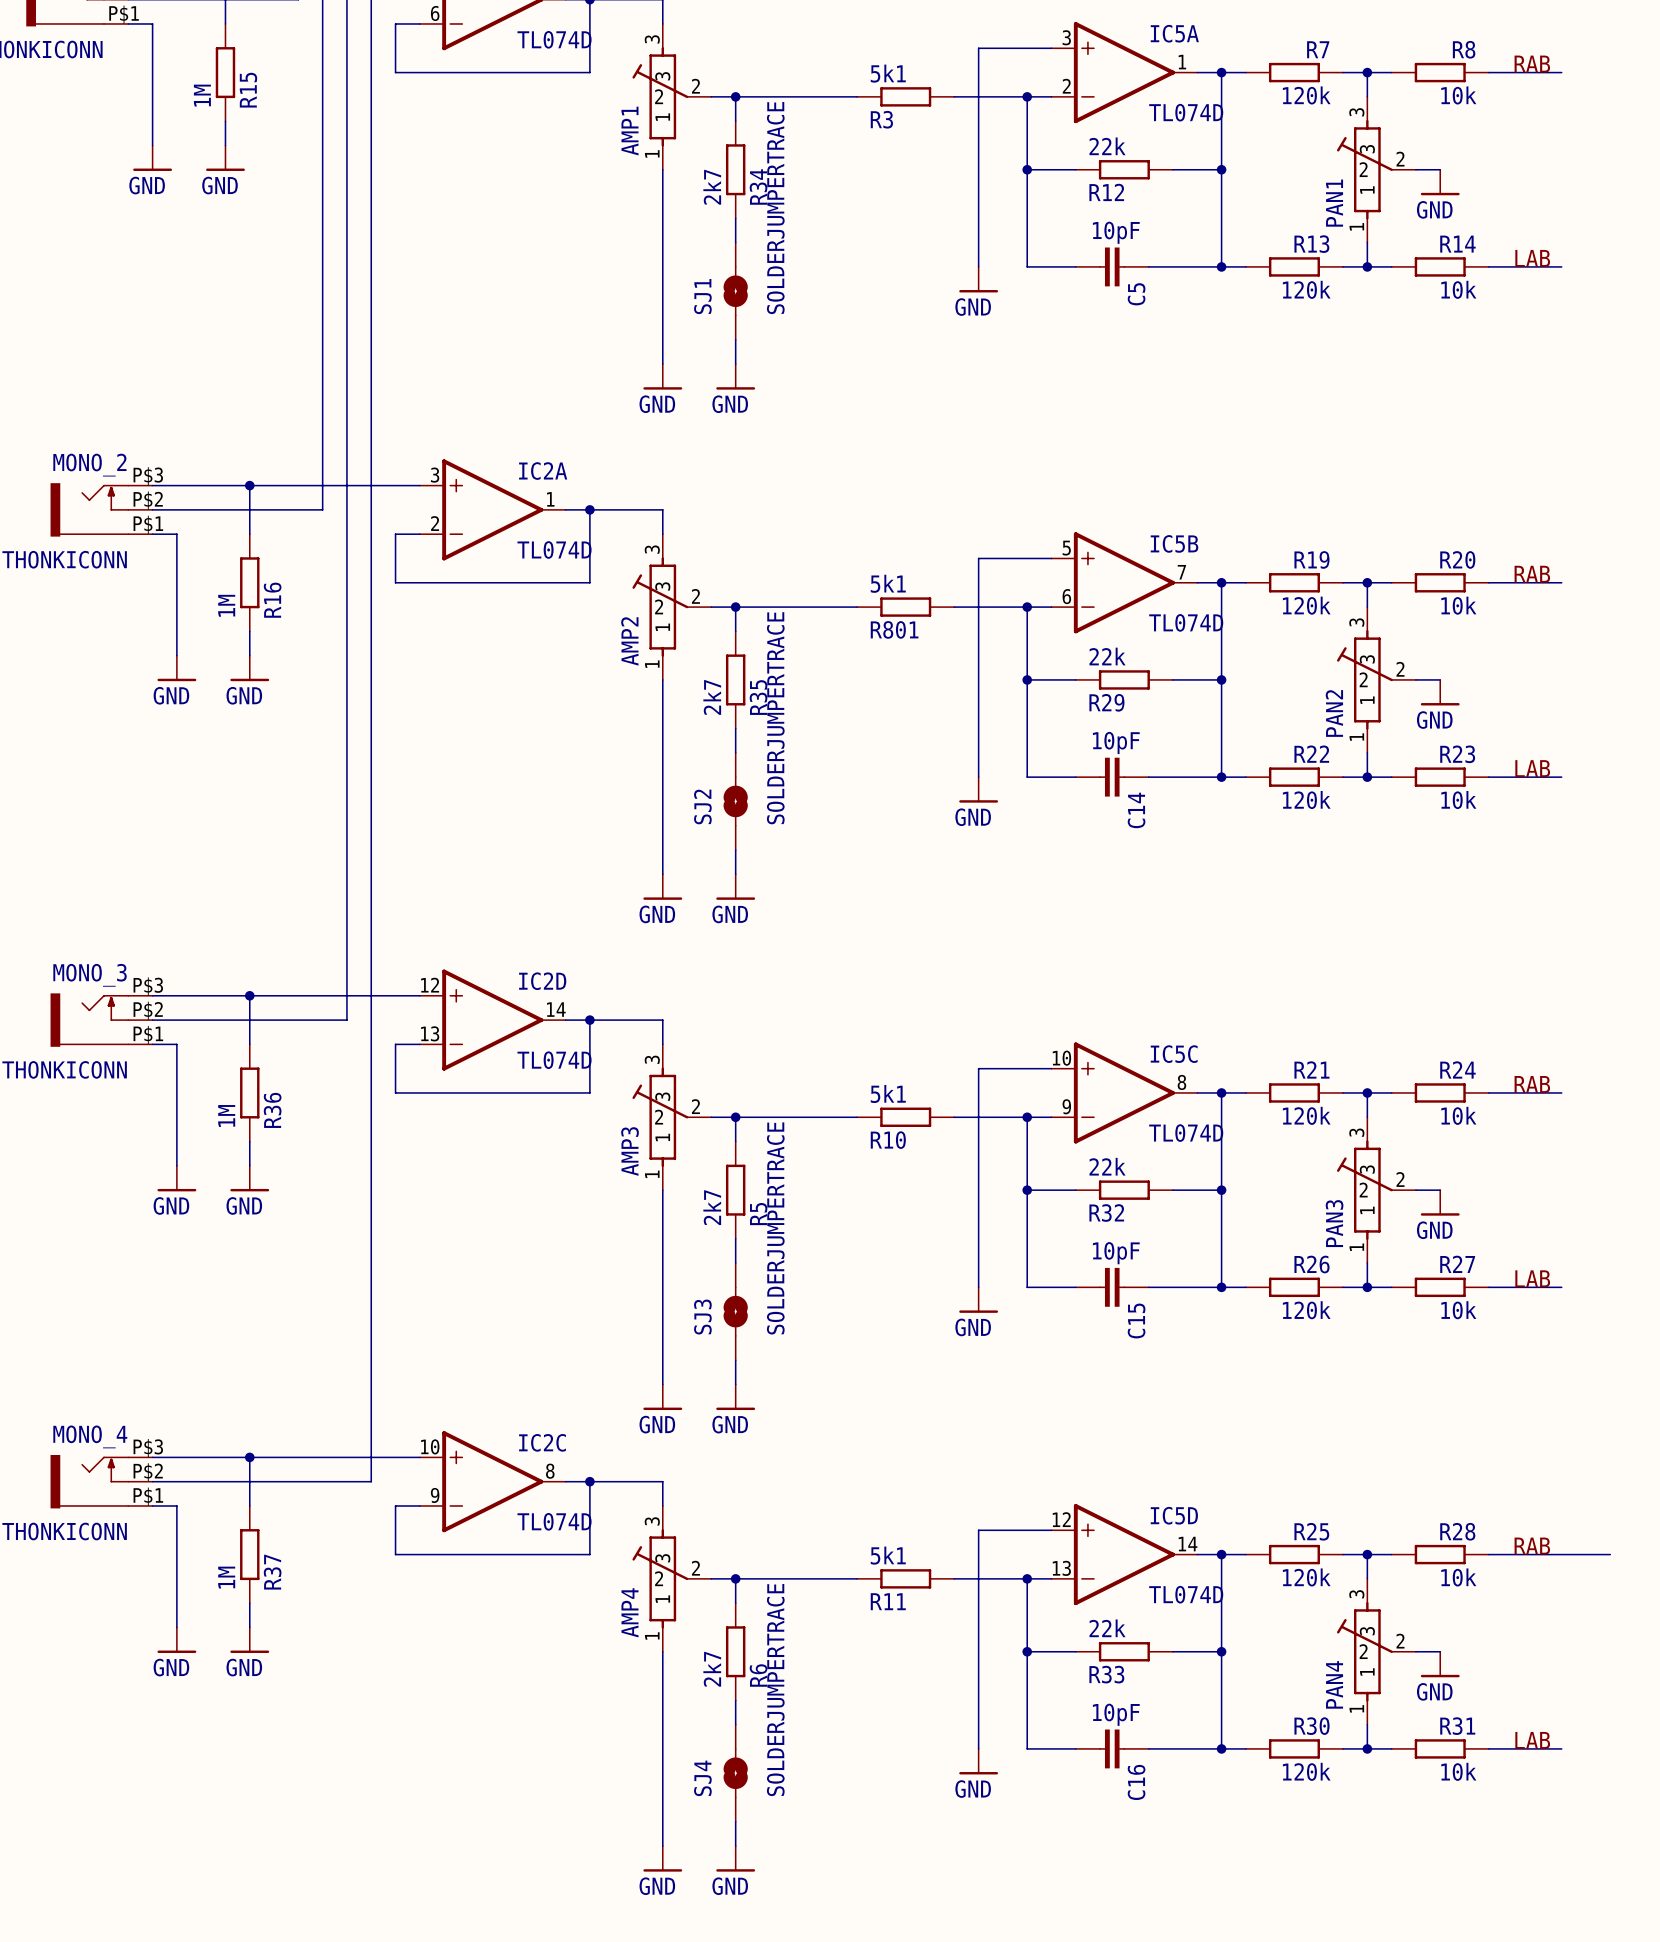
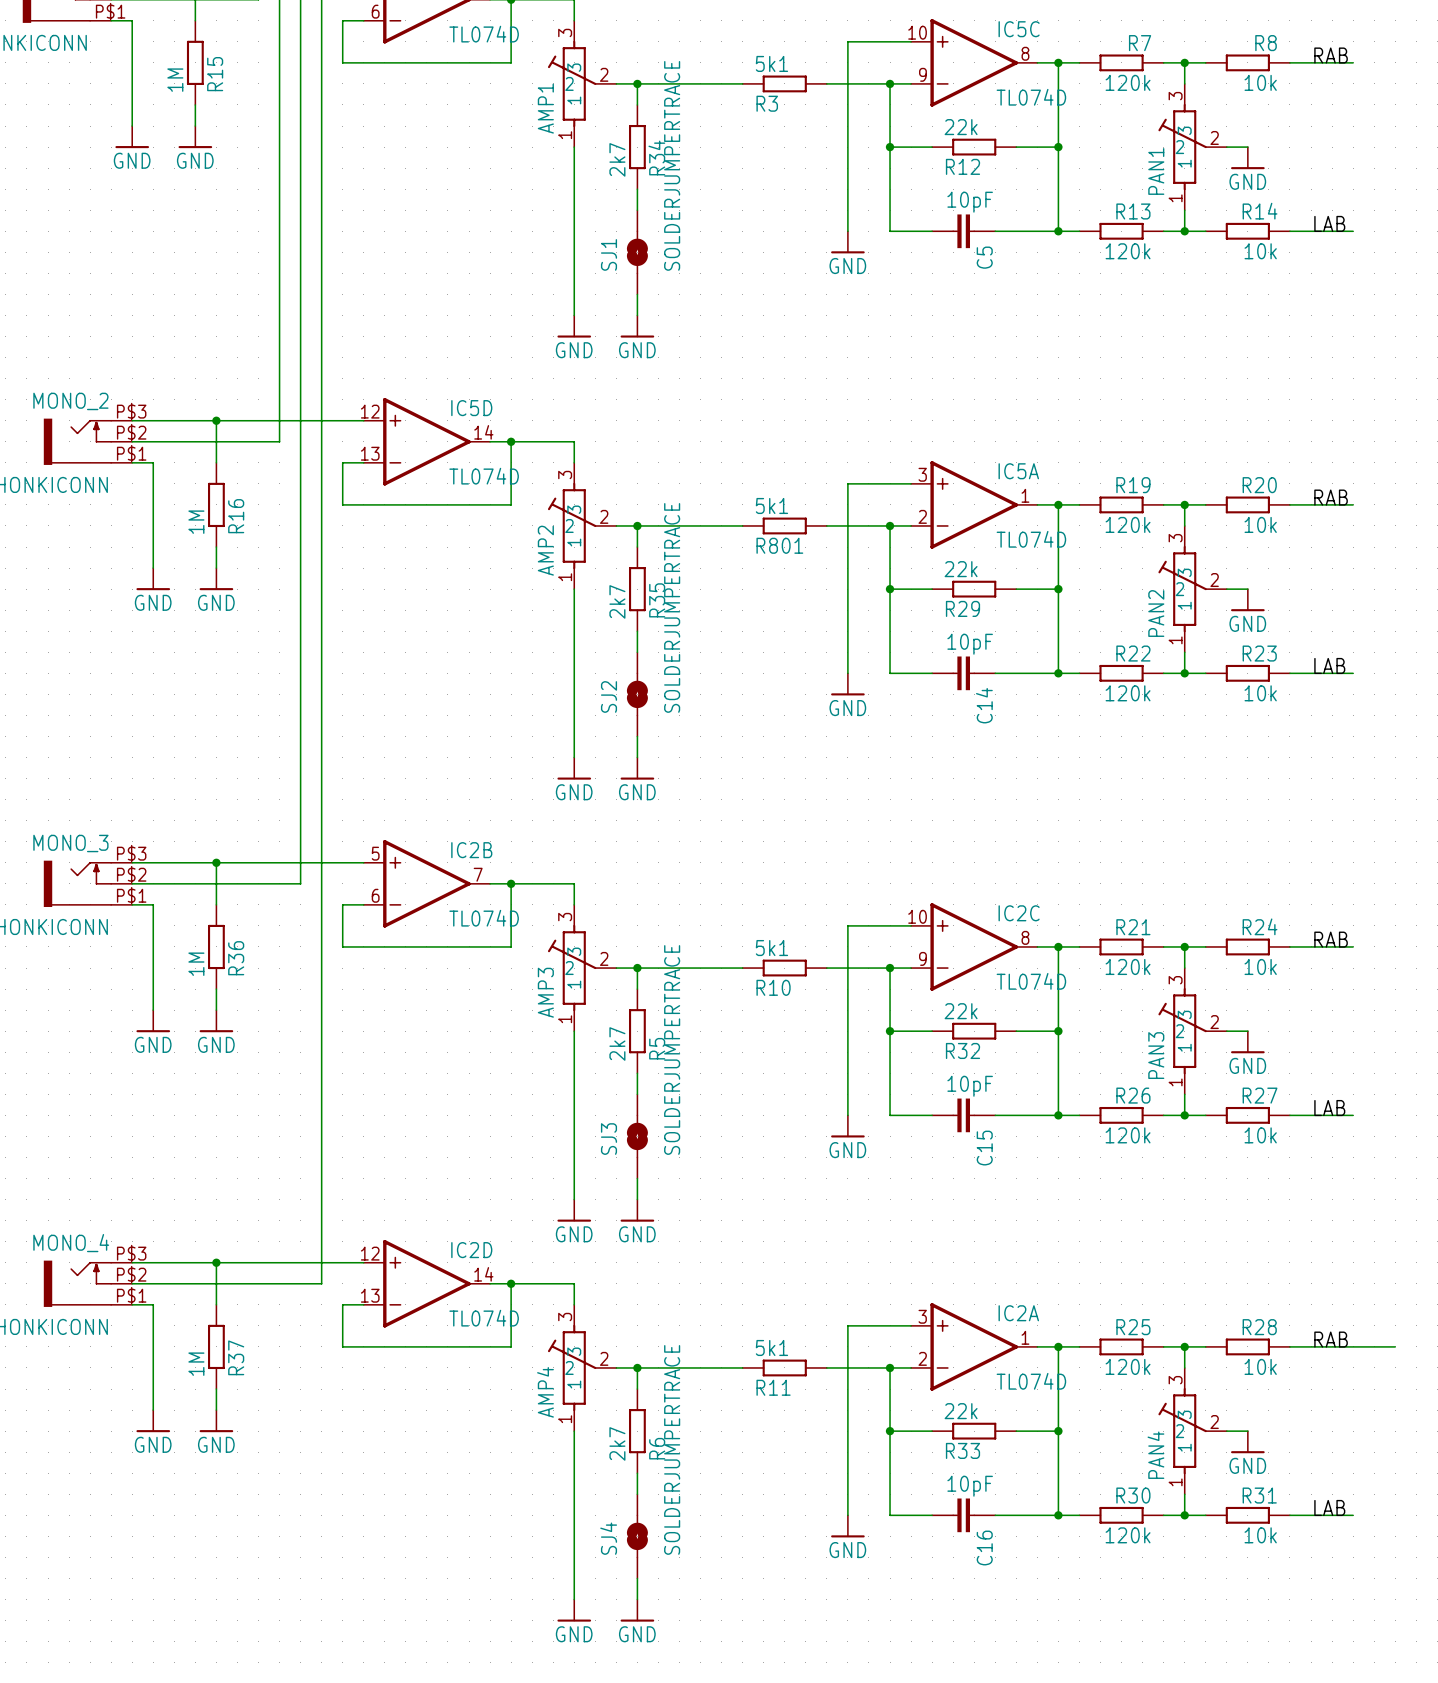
IC5A position: (1124, 72) -> (974, 504)
IC5C: none -> TL074D (974, 62)
IC2A position: (492, 509) -> (974, 1346)
IC5B: TL074D (1124, 582) -> none
IC2D position: (492, 1020) -> (426, 1283)
IC2B: none -> TL074D (426, 883)
IC5C name: IC5C (1174, 1054) -> IC2C (1019, 913)
IC2C: TL074D (492, 1481) -> none
IC5D position: (1124, 1554) -> (426, 441)

